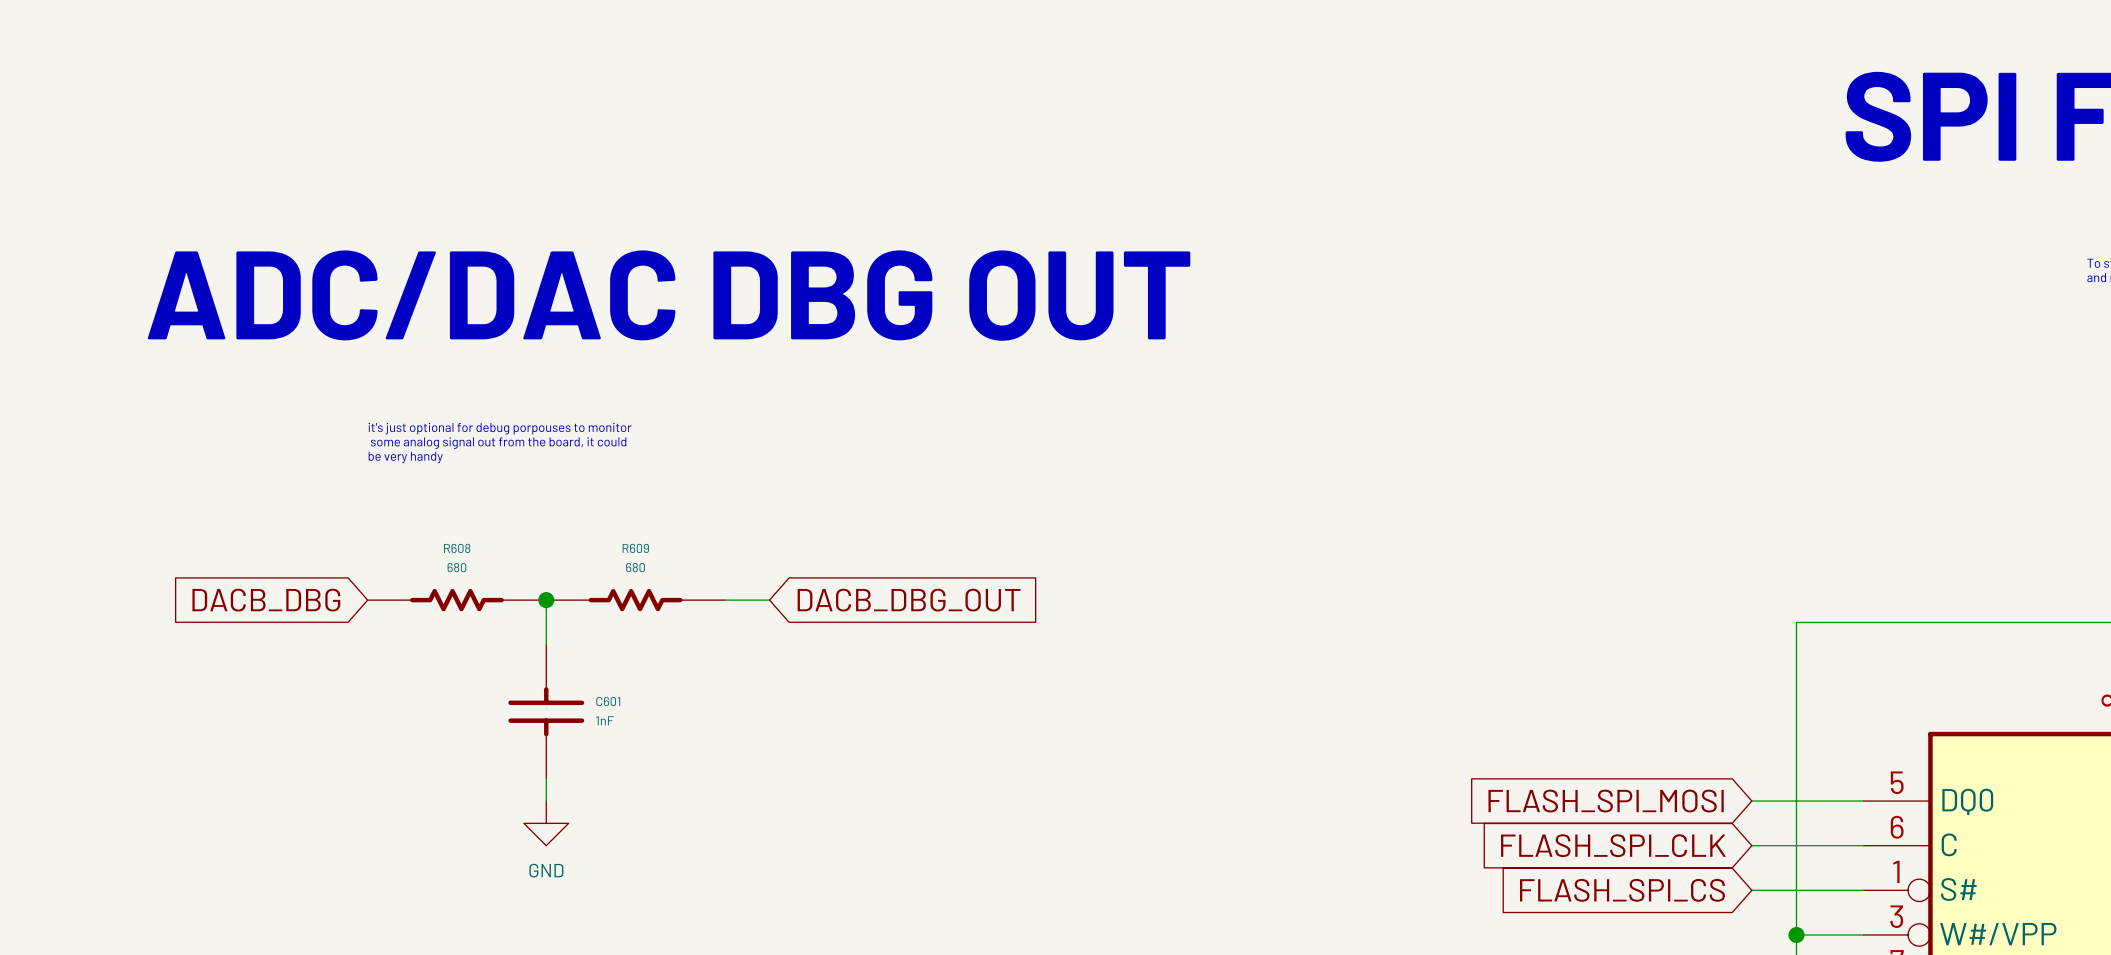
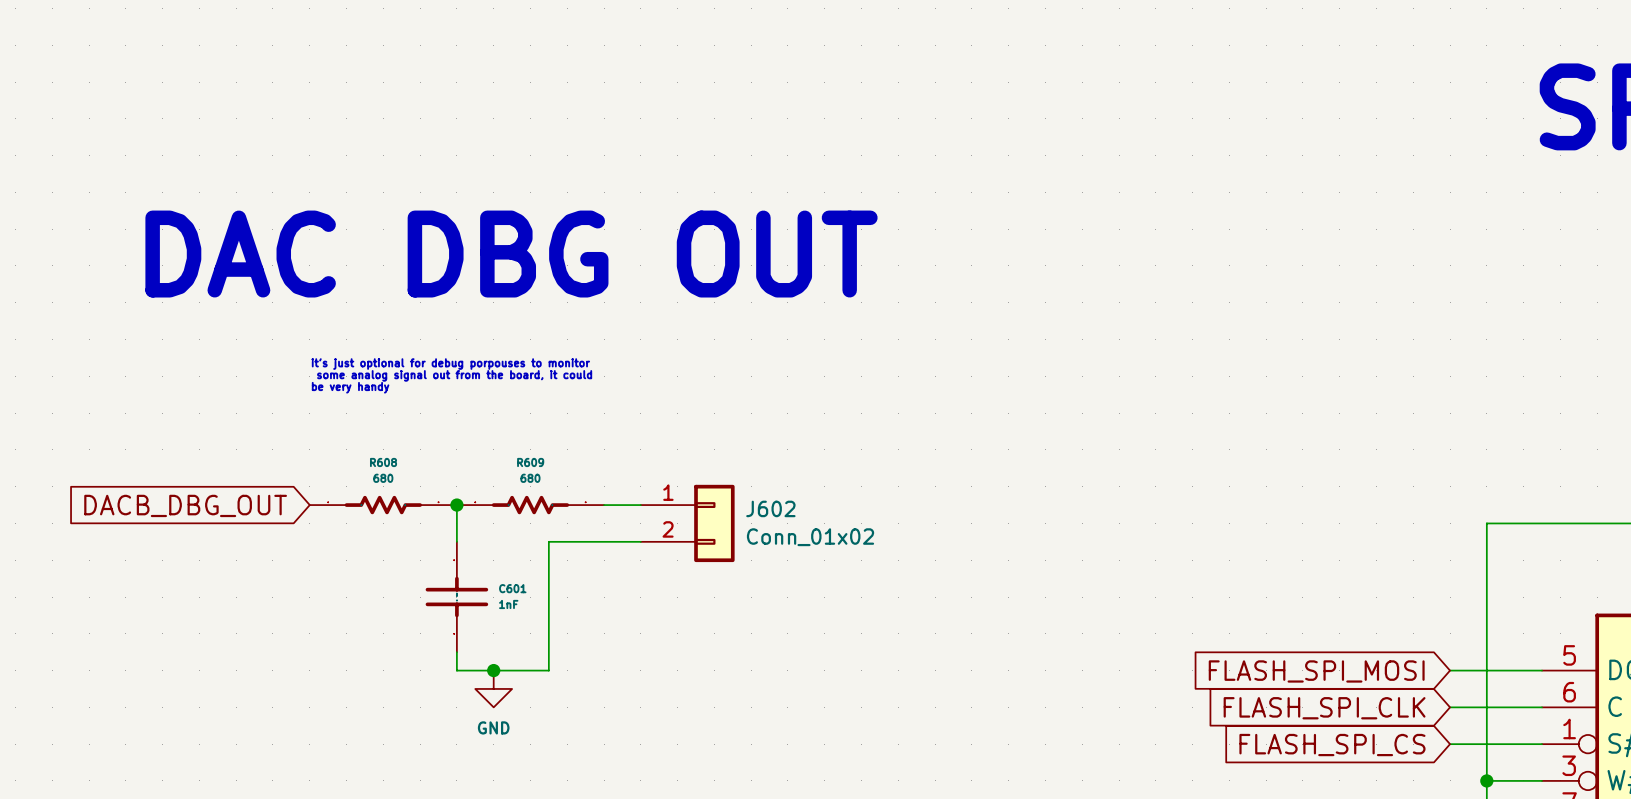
text: ADC/DAC DBG OUT (668, 295) -> DAC DBG OUT (511, 254)
global label: DACB_DBG (266, 600) -> DACB_DBG_OUT (185, 505)
global label: DACB_DBG_OUT (909, 600) -> none
J602: none -> Conn_01x02 (687, 523)
wire: none -> (640, 541) (548, 541) (548, 670) (456, 670)
junction: none -> (493, 670)
power symbol position: GND (546, 823) -> GND (493, 688)

